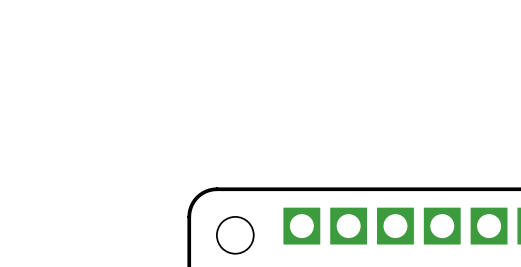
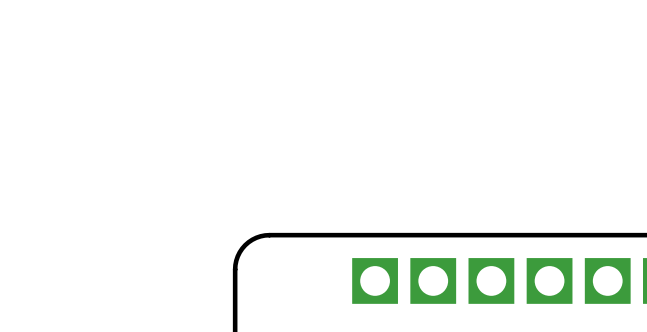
round board edge: [216, 216, 255, 255] -> none

